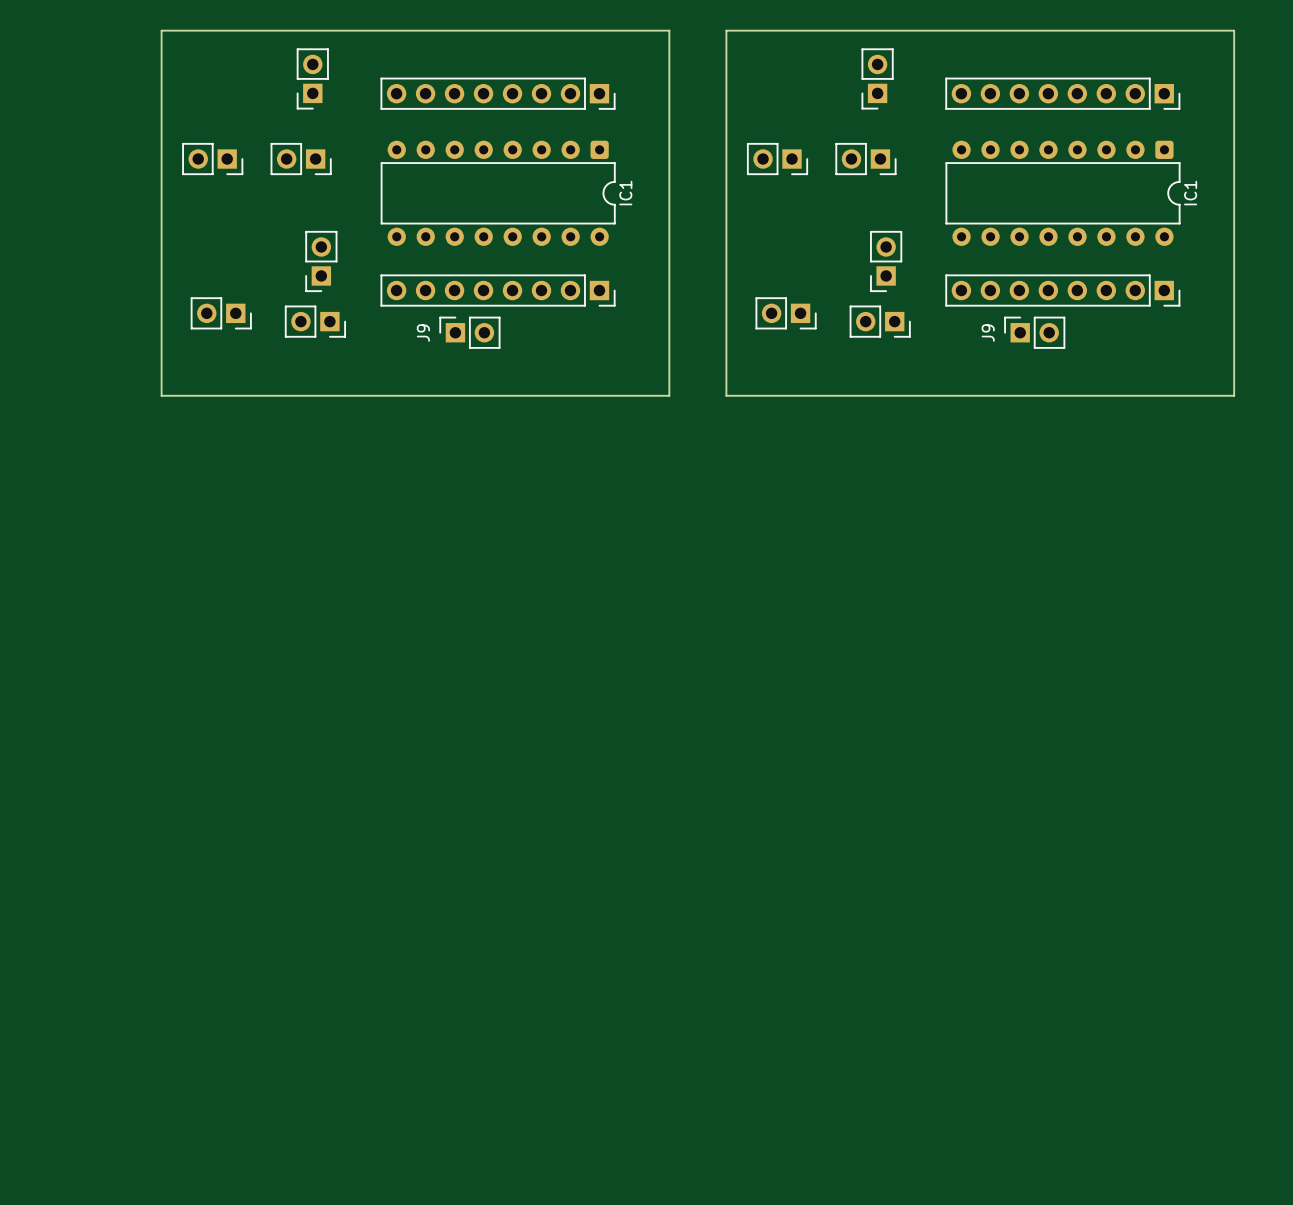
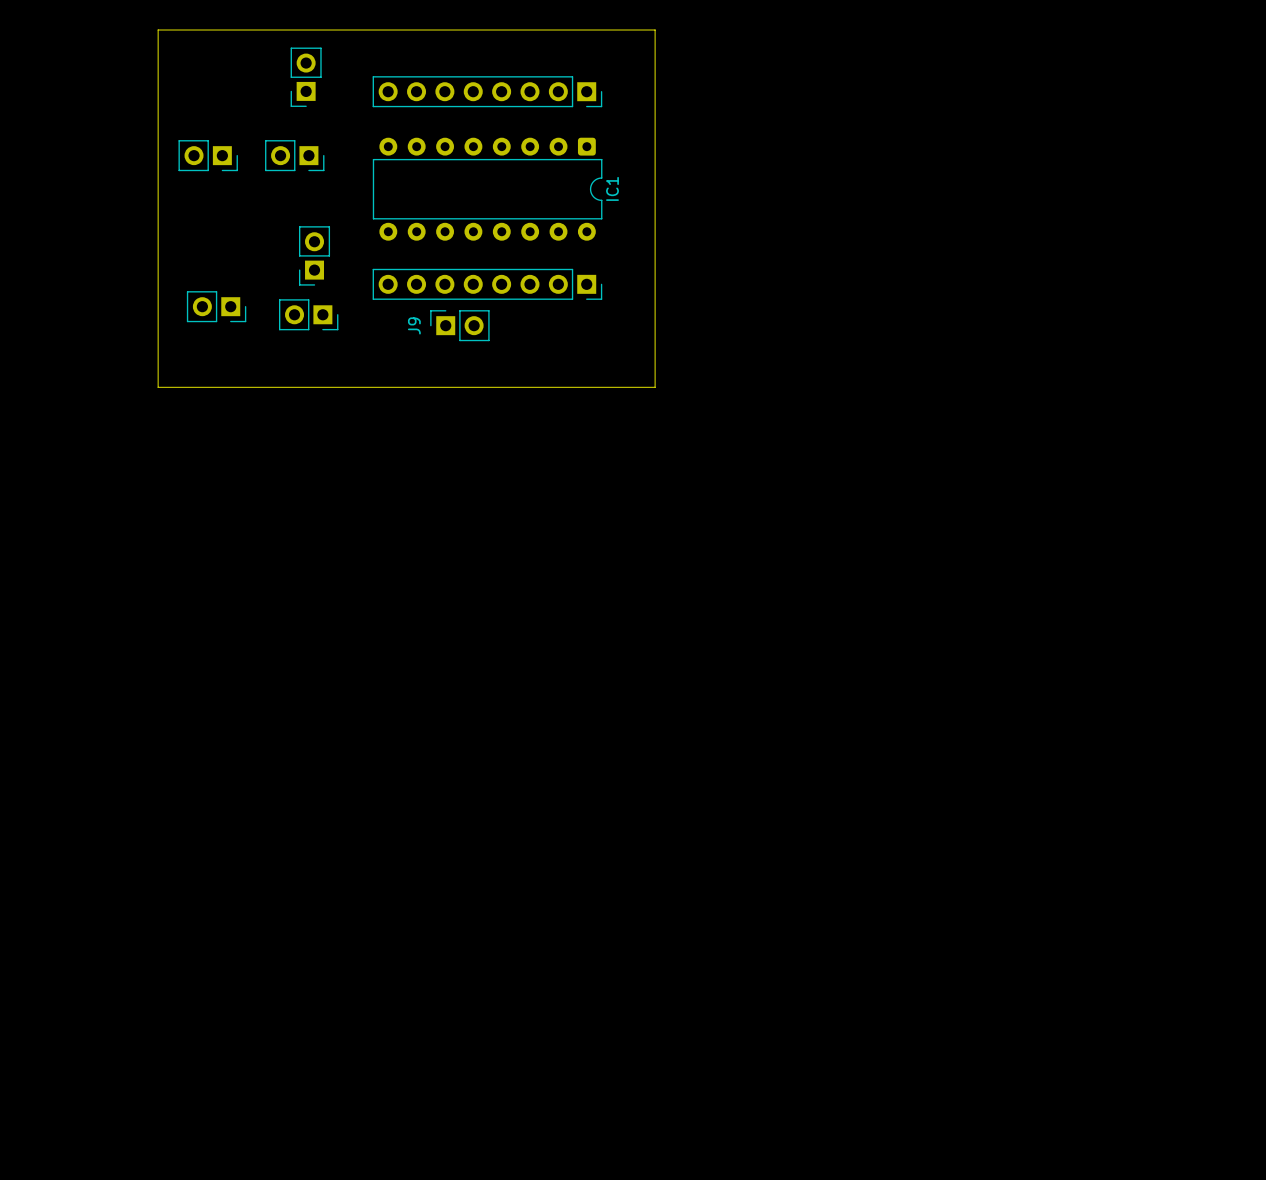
board edge: (726, 30) (1234, 30) (1234, 395) (726, 395) (726, 30) -> none
part: (877, 78) -> none
part: (1062, 93) -> none
part: (777, 159) -> none
part: (865, 159) -> none
IC1: (1063, 193) -> none
part: (886, 261) -> none
part: (1062, 290) -> none
part: (786, 313) -> none
part: (880, 321) -> none
J9: (1034, 332) -> none

